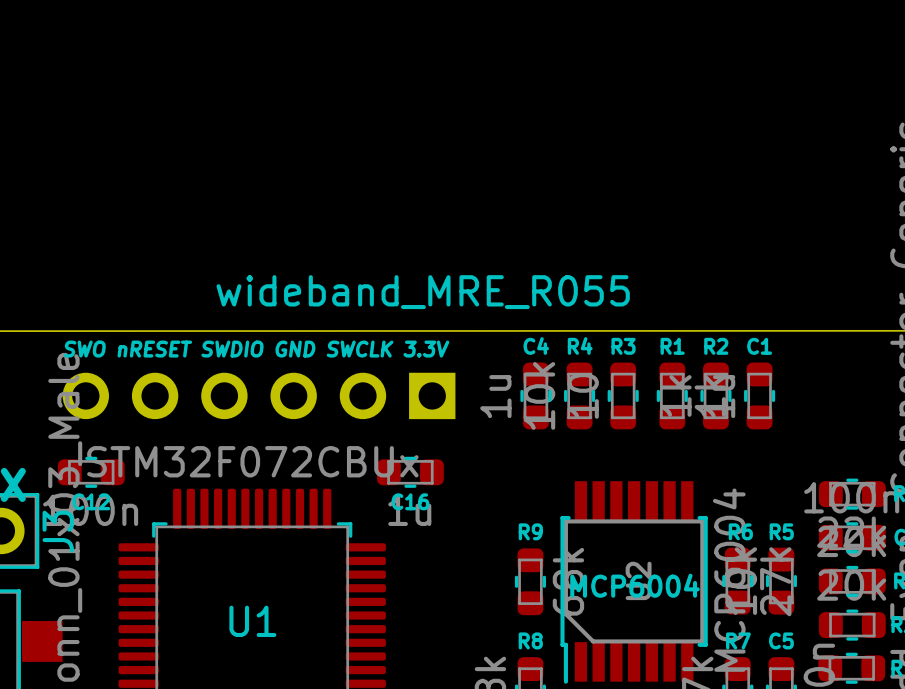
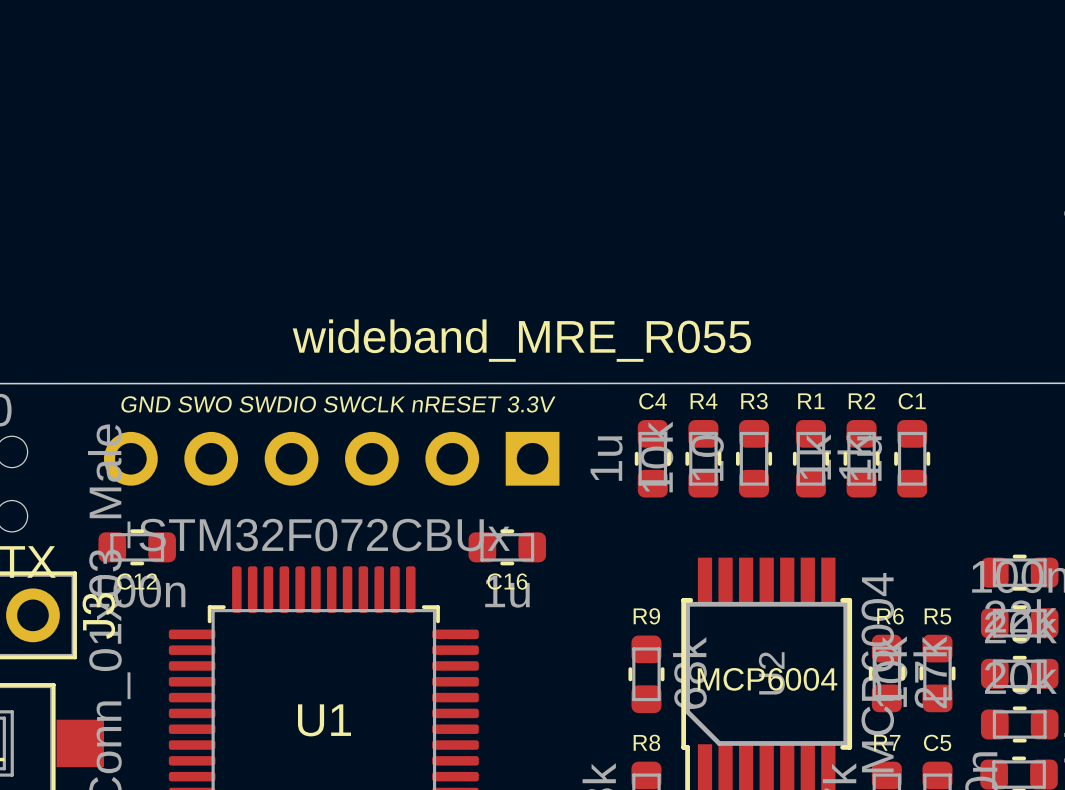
text: SWO nRESET SWDIO GND SWCLK 3.3V (256, 349) -> GND SWO SWDIO SWCLK nRESET 3.3V (338, 404)

